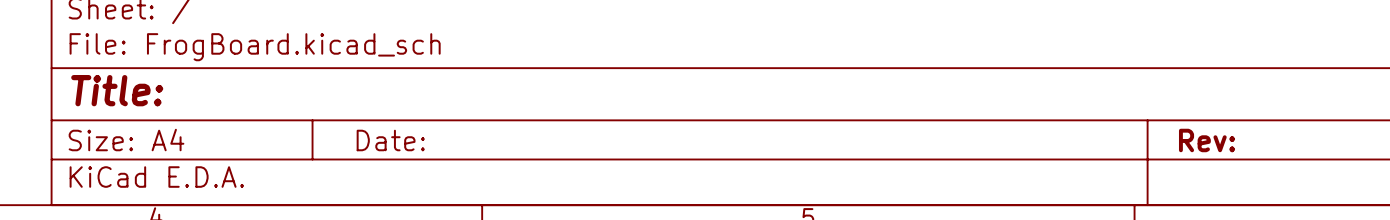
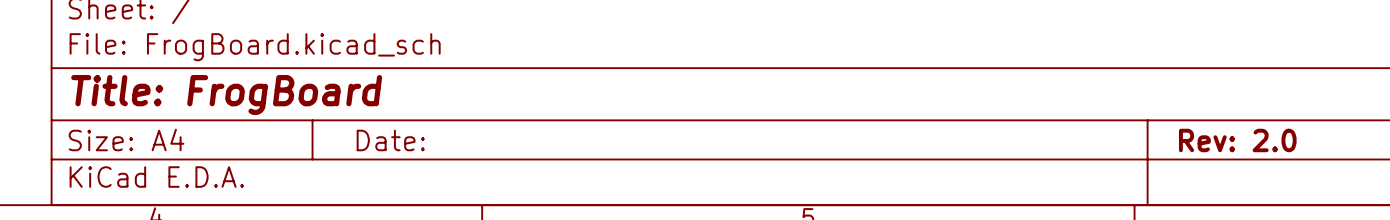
title block: Title: (117, 90) -> Title: FrogBoard (226, 95)
title block: Rev: (1207, 140) -> Rev: 2.0 (1237, 140)

